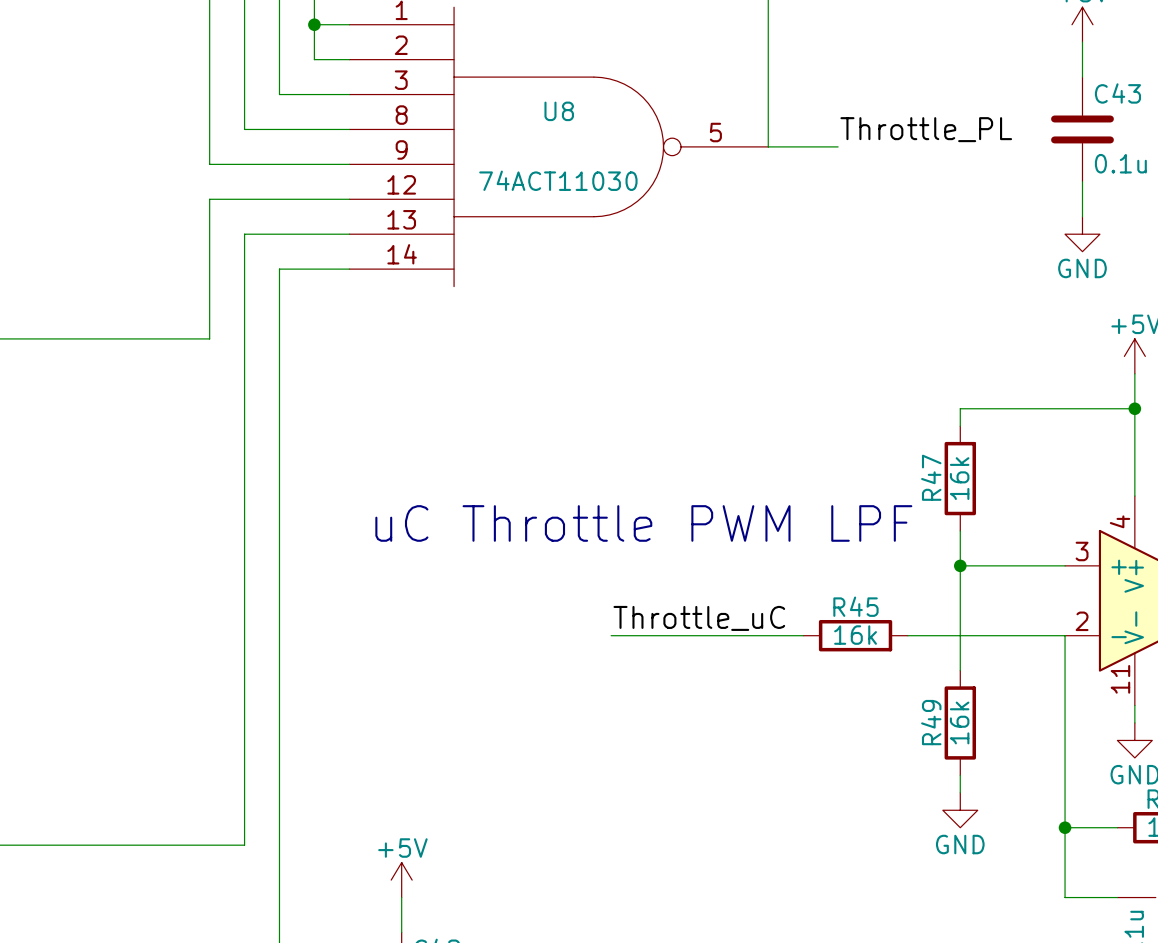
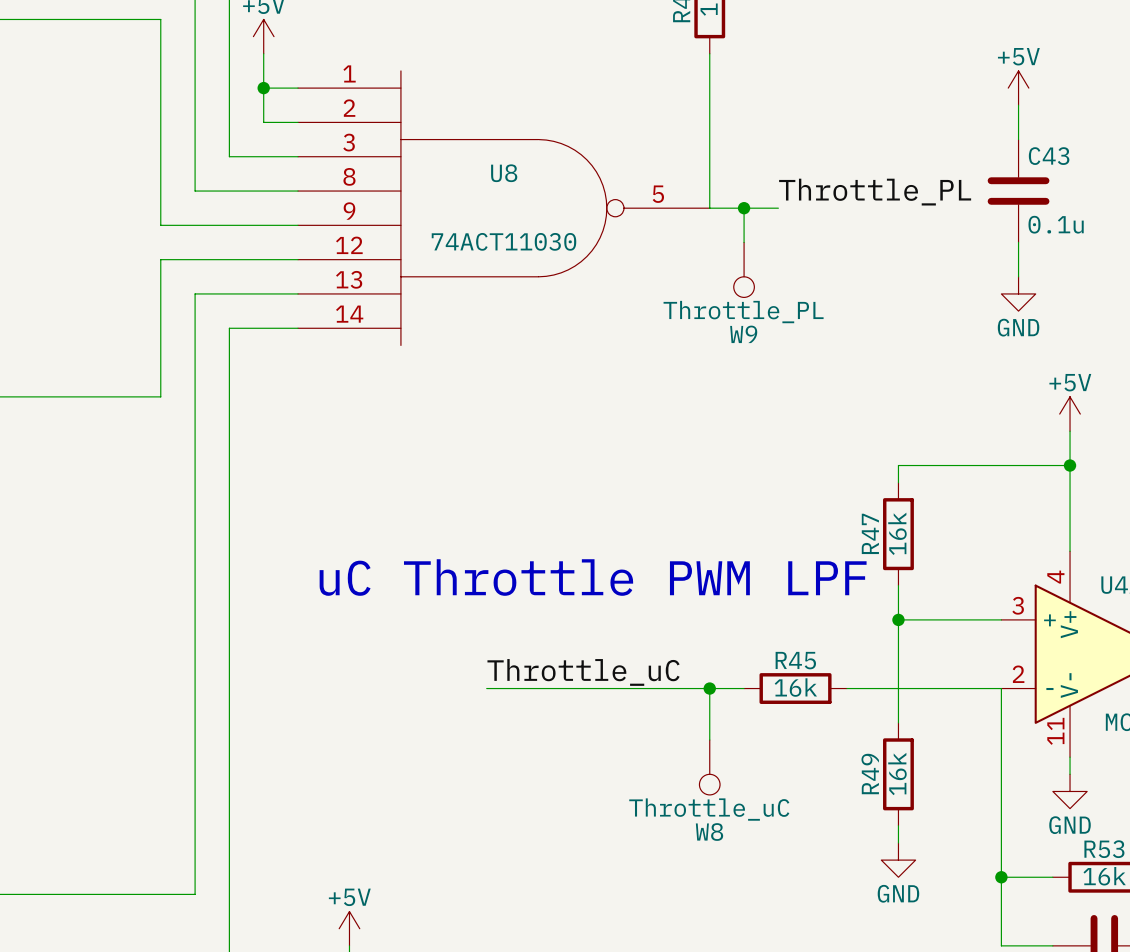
wire: none -> (744, 208) (744, 242)
junction: none -> (744, 208)
W9: none -> Throttle_PL (744, 269)
label position: Throttle_uC (699, 618) -> Throttle_uC (583, 672)
wire: none -> (486, 688) (555, 688)
wire: none -> (709, 688) (709, 740)
junction: none -> (709, 688)
W8: none -> Throttle_uC (709, 767)

